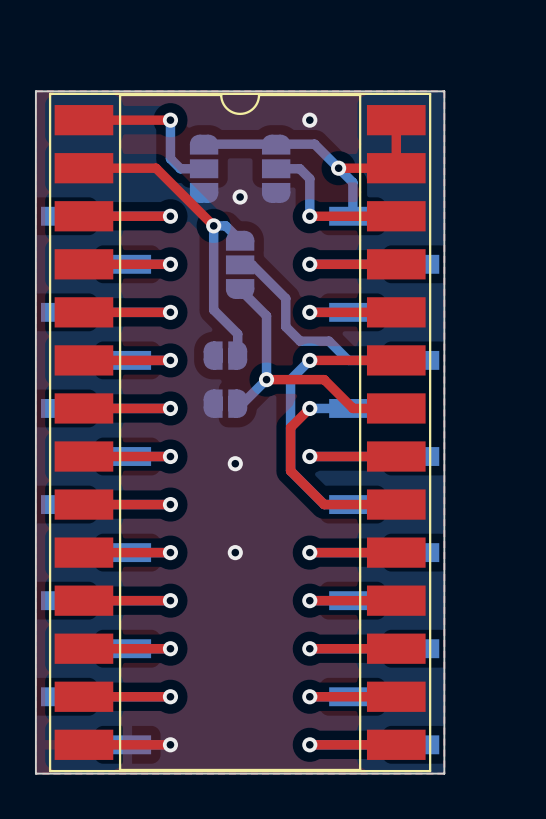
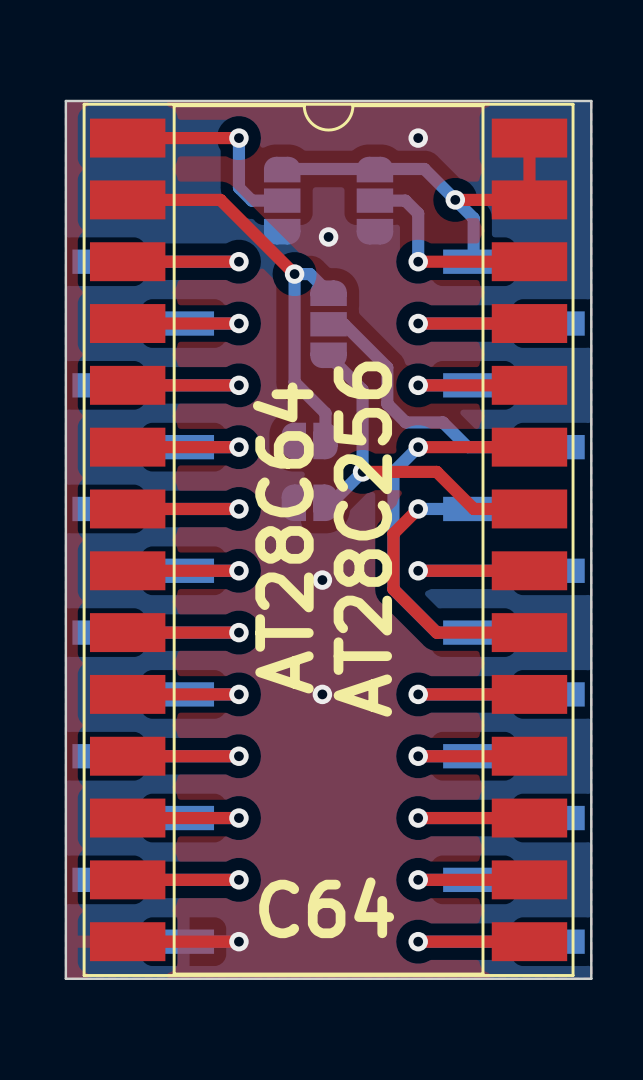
text: none -> AT28C64 (283, 537)
text: none -> AT28C256 (362, 539)
text: none -> C64 (326, 907)

